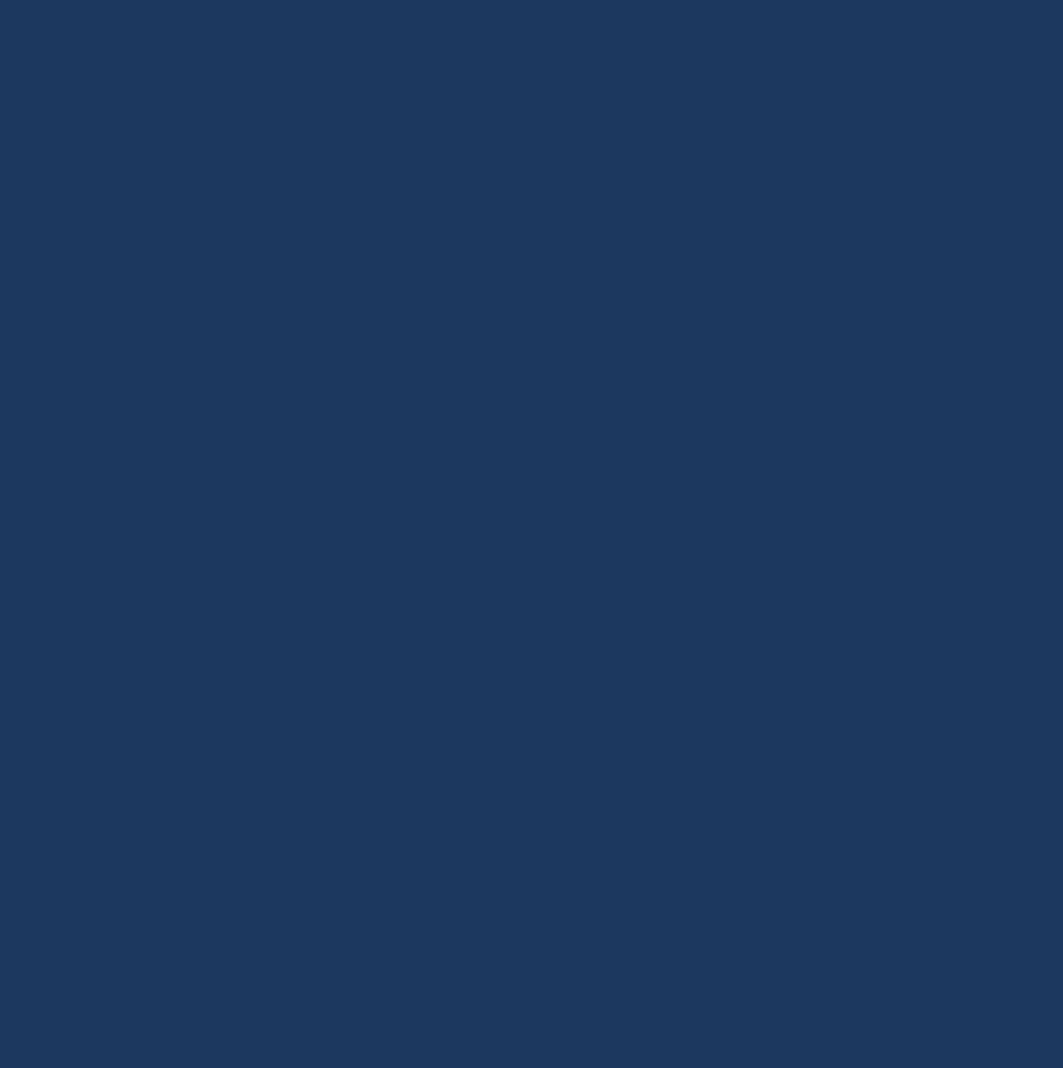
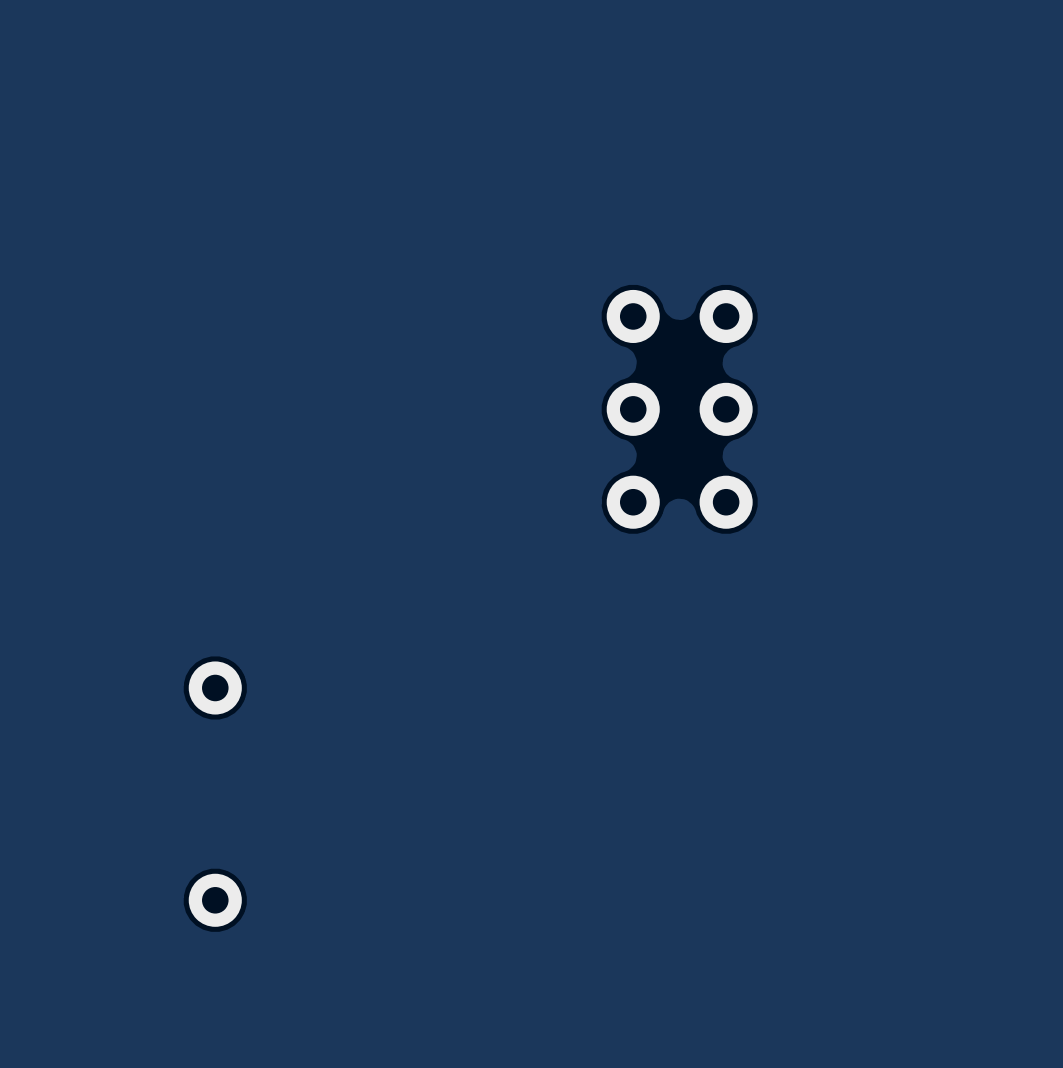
via: none -> (633, 316)
via: none -> (726, 316)
via: none -> (633, 409)
via: none -> (726, 409)
via: none -> (633, 502)
via: none -> (726, 502)
via: none -> (215, 687)
via: none -> (215, 900)

